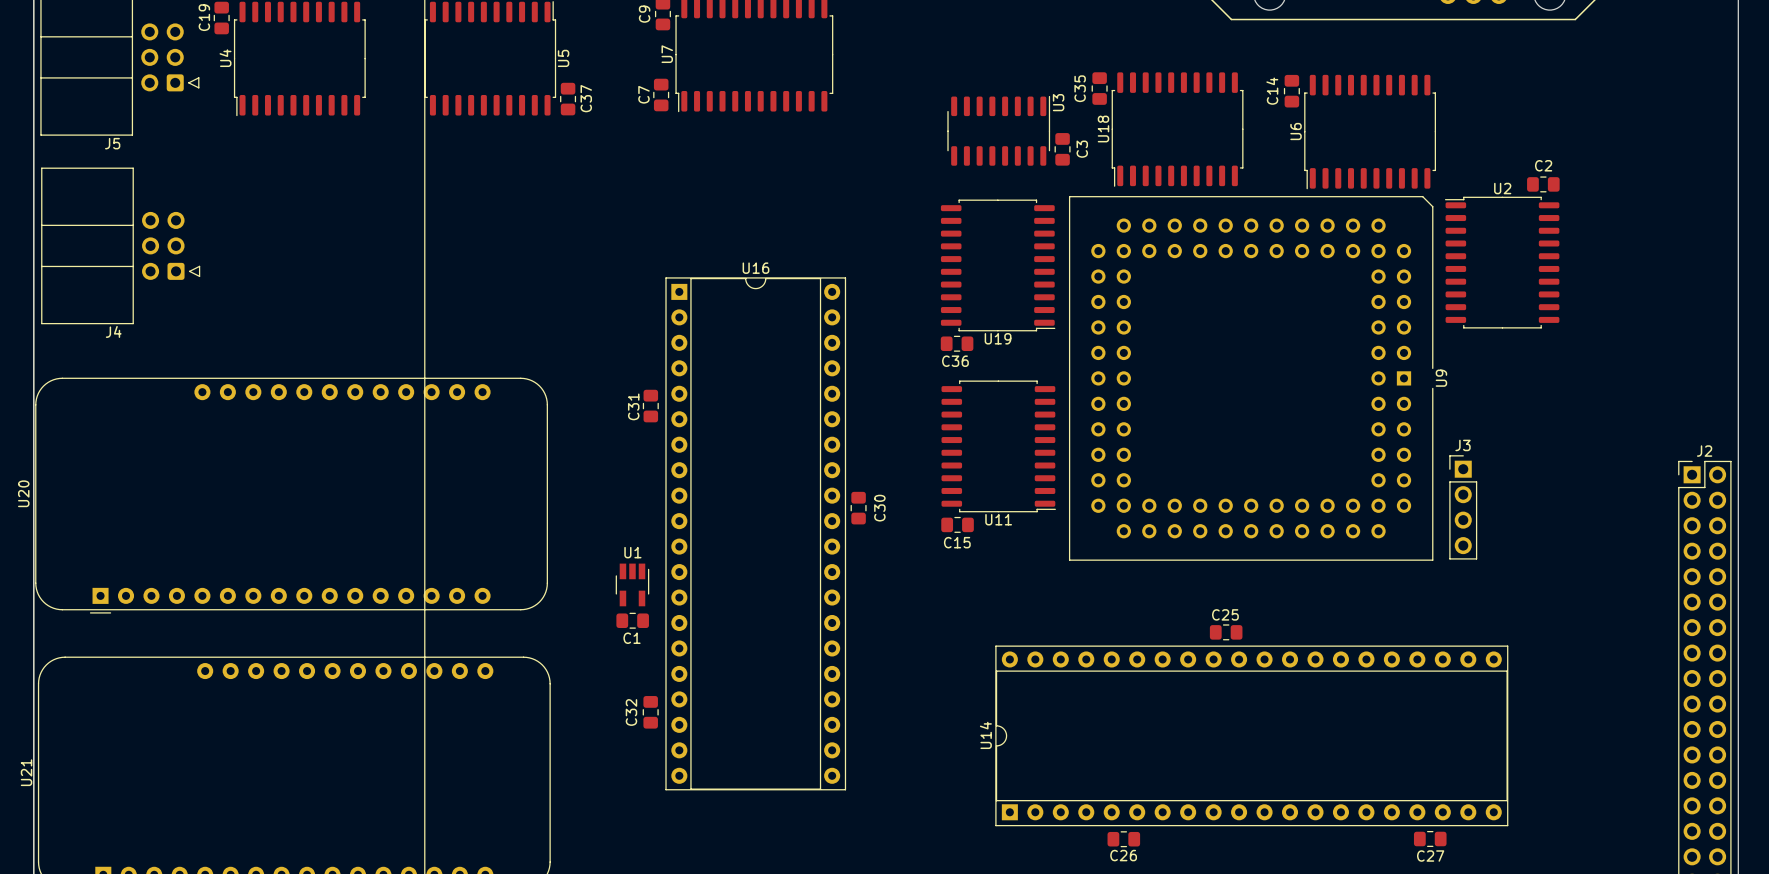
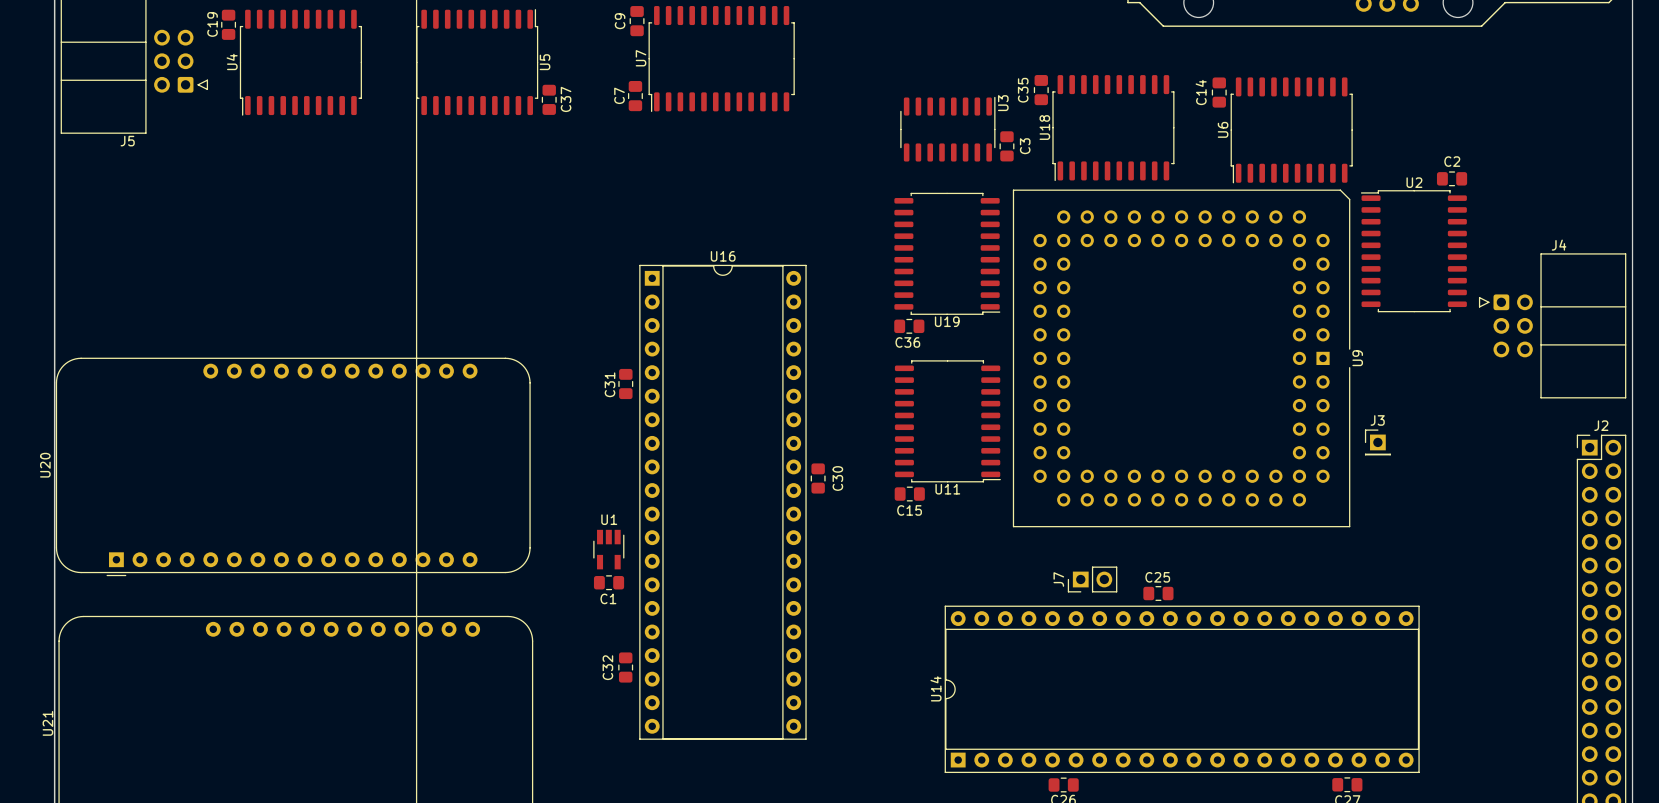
J4 rotation: 0° (120, 245) -> 180° (1552, 325)
J4 position: (120, 245) -> (1552, 325)
J3 footprint: [1449, 455, 1478, 560] -> [1364, 429, 1391, 456]
J7: none -> (1092, 579)

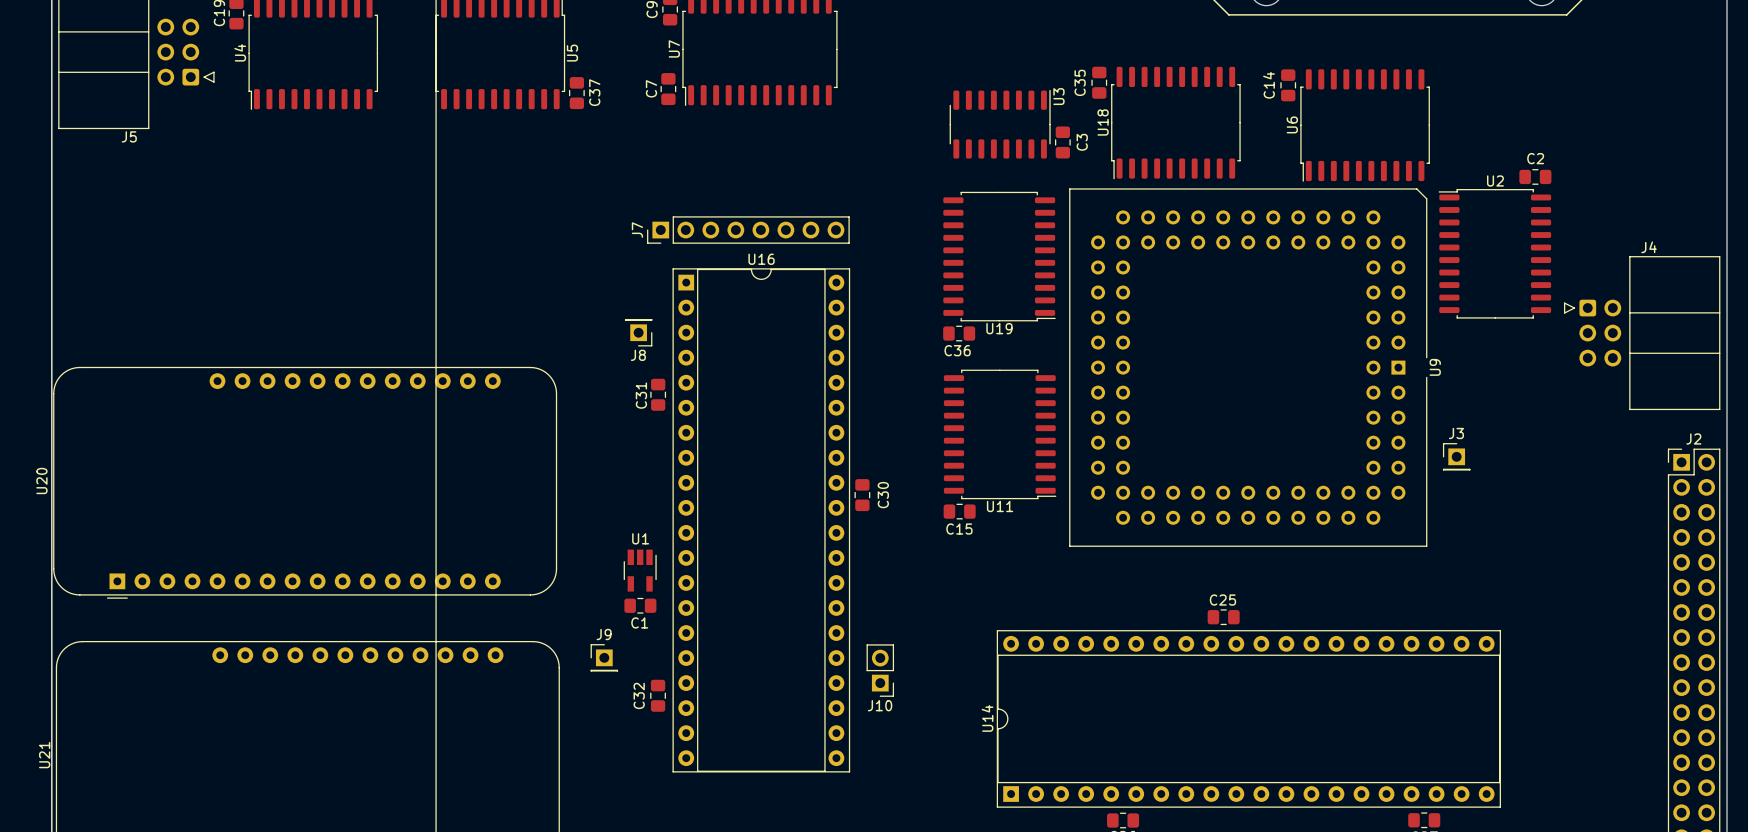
J8: none -> (638, 332)
J7 footprint: [1067, 566, 1118, 593] -> [647, 216, 850, 244]
J7 name position: J7 (1058, 579) -> J7 (637, 230)
J9: none -> (604, 657)
J10: none -> (880, 670)

